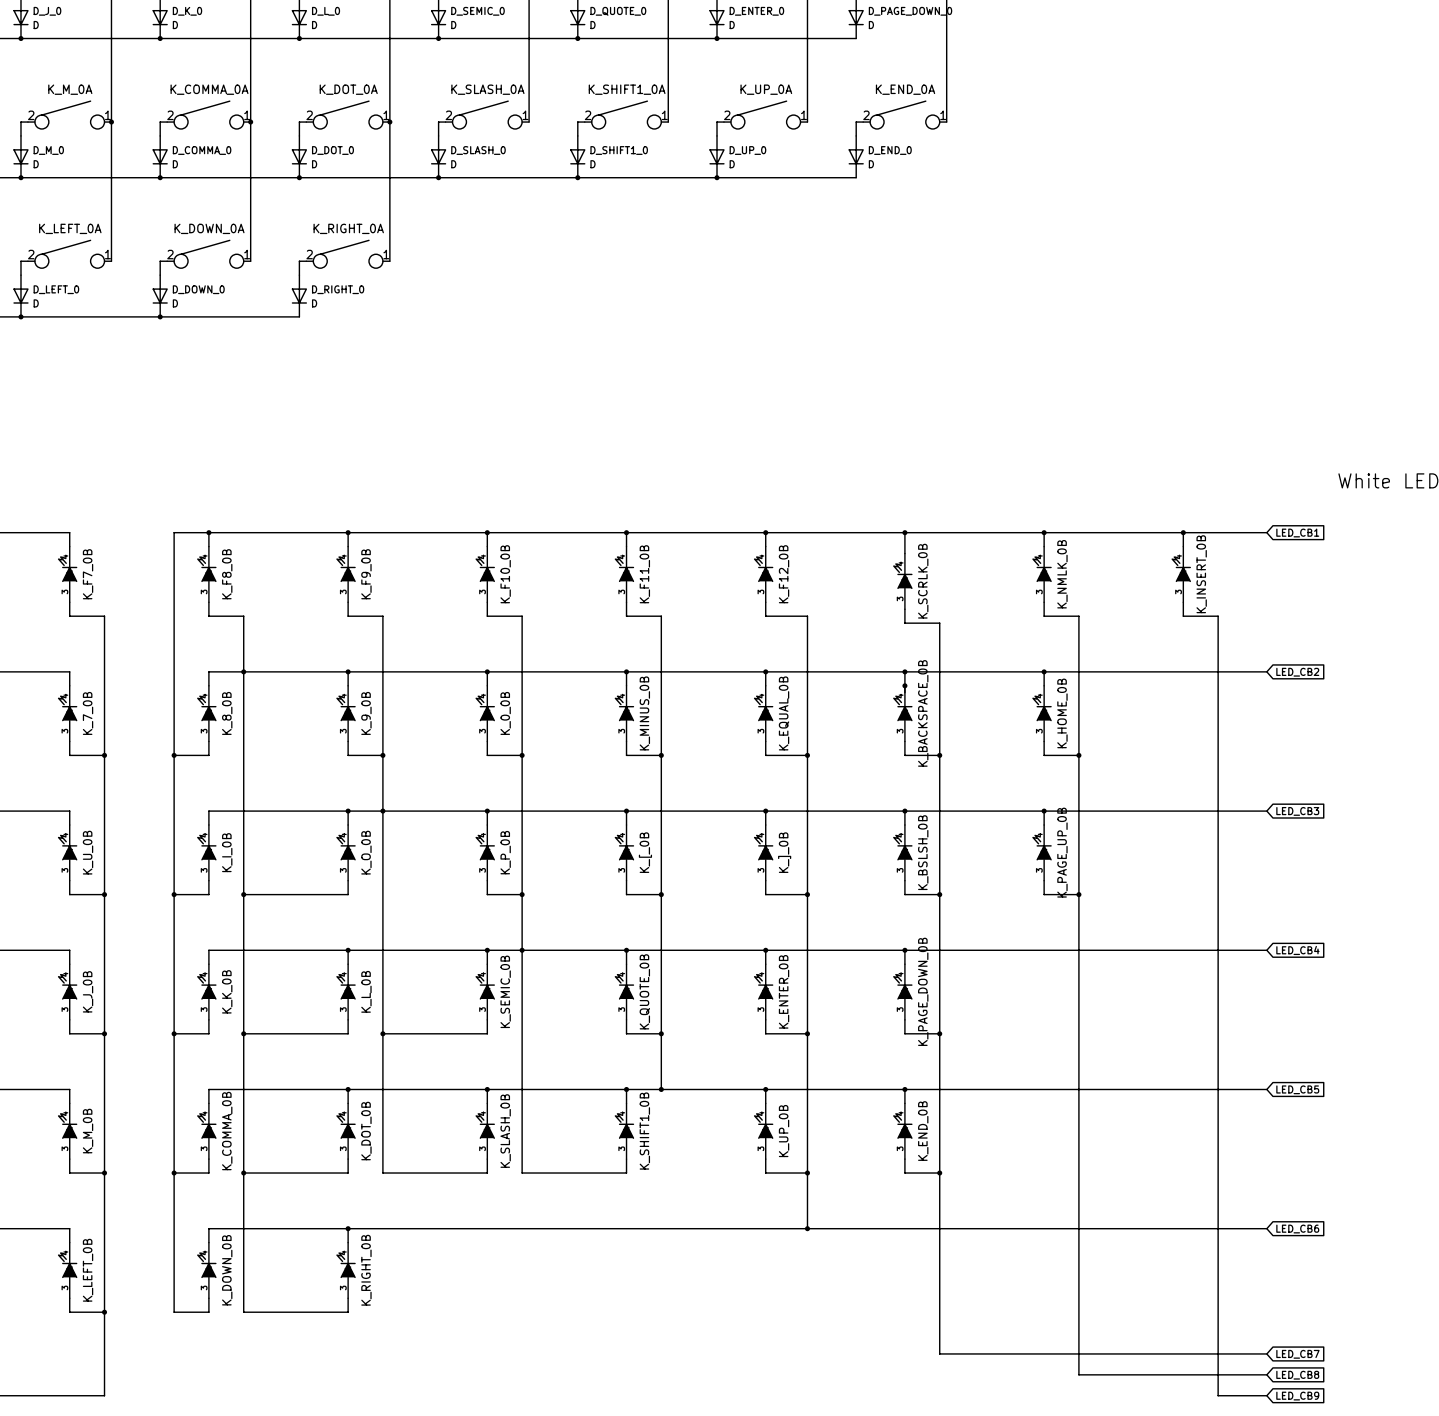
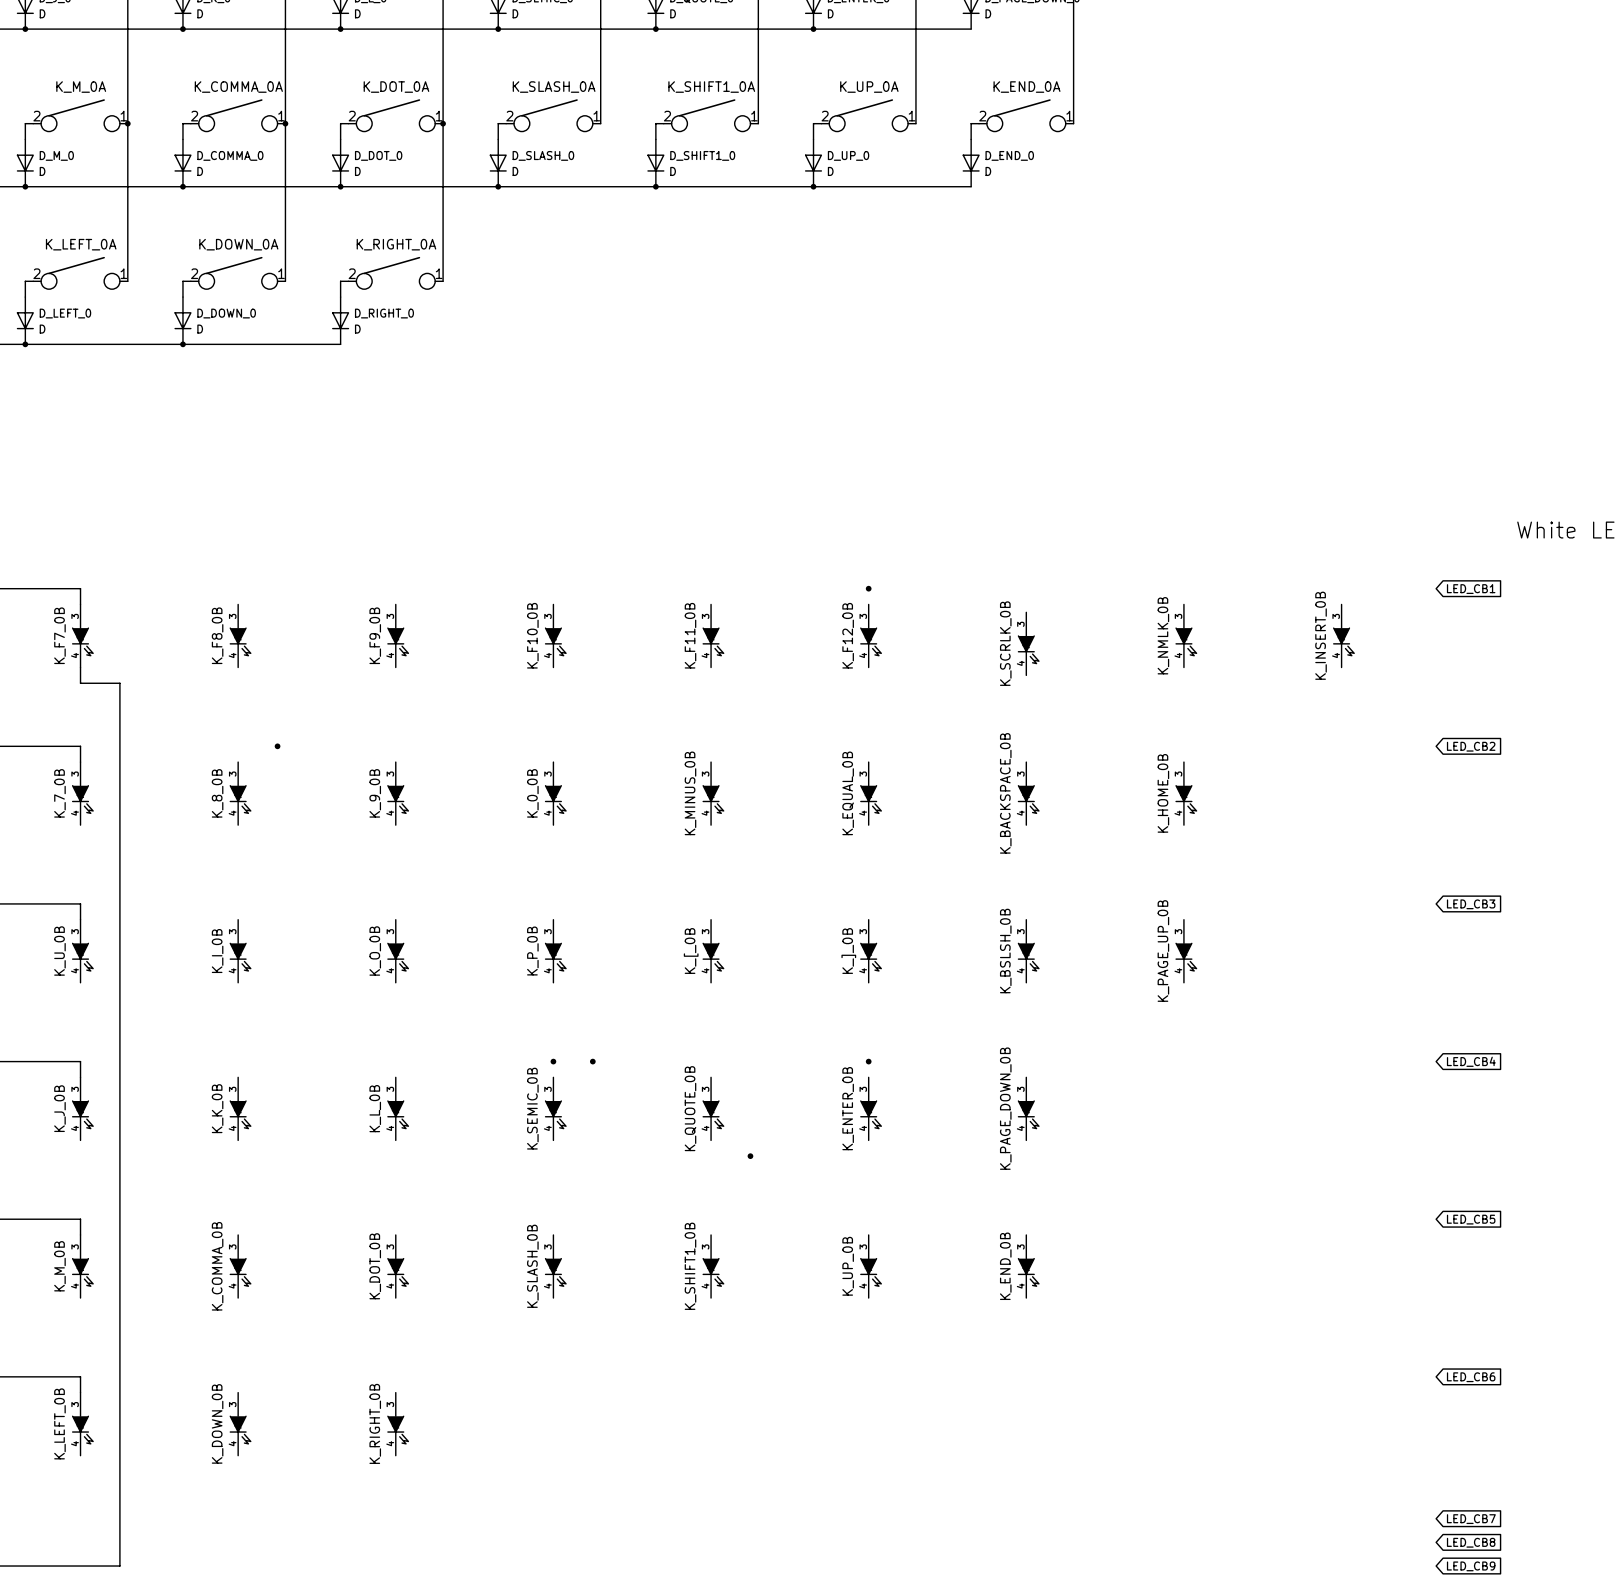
wire: (208, 532) (208, 546) -> none
junction: (208, 532) -> none
wire: (348, 532) (348, 546) -> none
junction: (348, 532) -> none
wire: (487, 532) (487, 546) -> none
junction: (487, 532) -> none
wire: (626, 532) (626, 546) -> none
junction: (626, 532) -> none
wire: (765, 532) (765, 546) -> none
wire: (904, 532) (904, 553) -> none
junction: (904, 532) -> none
wire: (1044, 532) (1044, 546) -> none
junction: (1044, 532) -> none
wire: (1183, 532) (1183, 546) -> none
junction: (1183, 532) -> none
wire: (1266, 532) (174, 532) (174, 1312) (208, 1312) (208, 1298) -> none
K_F7_0B rotation: 0° (67, 569) -> 180° (82, 641)
K_F8_0B rotation: 0° (206, 569) -> 180° (240, 641)
K_F9_0B rotation: 0° (346, 569) -> 180° (398, 641)
K_F10_0B rotation: 0° (485, 569) -> 180° (555, 641)
K_F11_0B rotation: 0° (624, 569) -> 180° (713, 641)
K_F12_0B rotation: 0° (763, 569) -> 180° (871, 641)
K_NMLK_0B rotation: 0° (1042, 569) -> 180° (1186, 641)
K_INSERT_0B rotation: 0° (1181, 569) -> 180° (1343, 641)
K_SCRLK_0B rotation: 0° (902, 576) -> 180° (1028, 649)
wire: (208, 602) (208, 616) (243, 616) (243, 1312) (348, 1312) (348, 1298) -> none
wire: (348, 602) (348, 616) (382, 616) (382, 1173) (487, 1173) (487, 1159) -> none
wire: (487, 602) (487, 616) (522, 616) (522, 1173) (626, 1173) (626, 1159) -> none
wire: (626, 602) (626, 616) (661, 616) (661, 1089) -> none
wire: (765, 602) (765, 616) (807, 616) (807, 1228) -> none
wire: (1044, 602) (1044, 616) (1078, 616) (1078, 1374) (1266, 1374) -> none
wire: (1183, 602) (1183, 616) (1218, 616) (1218, 1395) (1266, 1395) -> none
wire: (904, 609) (904, 623) (939, 623) (939, 1353) (1266, 1353) -> none
wire: (348, 671) (348, 685) -> none
junction: (348, 671) -> none
wire: (487, 671) (487, 685) -> none
junction: (487, 671) -> none
wire: (626, 671) (626, 685) -> none
junction: (626, 671) -> none
wire: (765, 671) (765, 685) -> none
junction: (765, 671) -> none
wire: (904, 671) (904, 692) -> none
junction: (904, 671) -> none
wire: (1044, 671) (1044, 685) -> none
junction: (1044, 671) -> none
wire: (1266, 671) (208, 671) (208, 685) -> none
junction: (904, 685) -> none
K_7_0B rotation: 0° (67, 708) -> 180° (82, 799)
K_8_0B rotation: 0° (206, 708) -> 180° (240, 799)
K_9_0B rotation: 0° (346, 708) -> 180° (398, 799)
K_0_0B rotation: 0° (485, 708) -> 180° (555, 799)
K_MINUS_0B rotation: 0° (624, 708) -> 180° (713, 799)
K_EQUAL_0B rotation: 0° (763, 708) -> 180° (871, 799)
K_BACKSPACE_0B rotation: 0° (902, 708) -> 180° (1028, 799)
K_HOME_0B rotation: 0° (1042, 708) -> 180° (1186, 799)
wire: (69, 741) (69, 755) (104, 755) -> none
wire: (208, 741) (208, 755) (174, 755) -> none
wire: (348, 741) (348, 755) (382, 755) -> none
wire: (487, 741) (487, 755) (522, 755) -> none
wire: (626, 741) (626, 755) (661, 755) -> none
wire: (765, 741) (765, 755) (807, 755) -> none
wire: (904, 741) (904, 755) (939, 755) -> none
wire: (1044, 741) (1044, 755) (1078, 755) -> none
junction: (104, 755) -> none
junction: (174, 755) -> none
junction: (382, 755) -> none
junction: (522, 755) -> none
junction: (661, 755) -> none
junction: (807, 755) -> none
junction: (939, 755) -> none
junction: (1078, 755) -> none
wire: (348, 811) (348, 825) -> none
junction: (348, 811) -> none
junction: (382, 811) -> none
wire: (487, 811) (487, 825) -> none
junction: (487, 811) -> none
wire: (626, 811) (626, 825) -> none
junction: (626, 811) -> none
wire: (765, 811) (765, 825) -> none
junction: (765, 811) -> none
wire: (904, 811) (904, 825) -> none
junction: (904, 811) -> none
wire: (1044, 811) (1044, 825) -> none
junction: (1044, 811) -> none
wire: (1266, 811) (208, 811) (208, 825) -> none
K_U_0B rotation: 0° (67, 847) -> 180° (82, 957)
K_I_0B rotation: 0° (206, 847) -> 180° (240, 957)
K_O_0B rotation: 0° (346, 847) -> 180° (398, 957)
K_P_0B rotation: 0° (485, 847) -> 180° (555, 957)
K_[_0B rotation: 0° (624, 847) -> 180° (713, 957)
K_]_0B rotation: 0° (763, 847) -> 180° (871, 957)
K_BSLSH_0B rotation: 0° (902, 847) -> 180° (1028, 957)
K_PAGE_UP_0B rotation: 0° (1042, 847) -> 180° (1186, 957)
wire: (69, 880) (69, 894) (104, 894) -> none
wire: (208, 880) (208, 894) (174, 894) -> none
wire: (348, 880) (348, 894) (243, 894) -> none
wire: (487, 880) (487, 894) (522, 894) -> none
wire: (626, 880) (626, 894) (661, 894) -> none
wire: (765, 880) (765, 894) (807, 894) -> none
wire: (904, 880) (904, 894) (939, 894) -> none
wire: (1044, 880) (1044, 894) (1078, 894) -> none
junction: (104, 894) -> none
junction: (174, 894) -> none
junction: (243, 894) -> none
junction: (522, 894) -> none
junction: (661, 894) -> none
junction: (807, 894) -> none
junction: (939, 894) -> none
junction: (1078, 894) -> none
wire: (348, 950) (348, 964) -> none
junction: (348, 950) -> none
wire: (487, 950) (487, 964) -> none
wire: (626, 950) (626, 964) -> none
junction: (626, 950) -> none
wire: (765, 950) (765, 964) -> none
wire: (904, 950) (904, 964) -> none
junction: (904, 950) -> none
wire: (1266, 950) (208, 950) (208, 964) -> none
K_J_0B rotation: 0° (67, 986) -> 180° (82, 1114)
K_K_0B rotation: 0° (206, 986) -> 180° (240, 1114)
K_L_0B rotation: 0° (346, 986) -> 180° (398, 1114)
K_SEMIC_0B rotation: 0° (485, 986) -> 180° (555, 1114)
K_QUOTE_0B rotation: 0° (624, 986) -> 180° (713, 1114)
K_ENTER_0B rotation: 0° (763, 986) -> 180° (871, 1114)
K_PAGE_DOWN_0B rotation: 0° (902, 986) -> 180° (1028, 1114)
wire: (69, 1019) (69, 1033) (104, 1033) -> none
wire: (208, 1019) (208, 1033) (174, 1033) -> none
wire: (348, 1019) (348, 1033) (243, 1033) -> none
wire: (487, 1019) (487, 1033) (382, 1033) -> none
wire: (626, 1019) (626, 1033) (661, 1033) -> none
wire: (765, 1019) (765, 1033) (807, 1033) -> none
wire: (904, 1019) (904, 1033) (939, 1033) -> none
junction: (104, 1033) -> none
junction: (174, 1033) -> none
junction: (243, 1033) -> none
junction: (382, 1033) -> none
junction: (807, 1033) -> none
junction: (939, 1033) -> none
wire: (348, 1089) (348, 1103) -> none
junction: (348, 1089) -> none
wire: (487, 1089) (487, 1103) -> none
junction: (487, 1089) -> none
wire: (626, 1089) (626, 1103) -> none
junction: (626, 1089) -> none
junction: (661, 1089) -> none
wire: (765, 1089) (765, 1103) -> none
junction: (765, 1089) -> none
wire: (904, 1089) (904, 1103) -> none
junction: (904, 1089) -> none
wire: (1266, 1089) (208, 1089) (208, 1103) -> none
K_M_0B rotation: 0° (67, 1126) -> 180° (82, 1272)
K_COMMA_0B rotation: 0° (206, 1126) -> 180° (240, 1272)
K_DOT_0B rotation: 0° (346, 1126) -> 180° (398, 1272)
K_SLASH_0B rotation: 0° (485, 1126) -> 180° (555, 1272)
K_SHIFT1_0B rotation: 0° (624, 1126) -> 180° (713, 1272)
K_UP_0B rotation: 0° (763, 1126) -> 180° (871, 1272)
K_END_0B rotation: 0° (902, 1126) -> 180° (1028, 1272)
wire: (69, 1159) (69, 1173) (104, 1173) -> none
wire: (208, 1159) (208, 1173) (174, 1173) -> none
wire: (348, 1159) (348, 1173) (243, 1173) -> none
wire: (765, 1159) (765, 1173) (807, 1173) -> none
wire: (904, 1159) (904, 1173) (939, 1173) -> none
junction: (104, 1173) -> none
junction: (174, 1173) -> none
junction: (243, 1173) -> none
junction: (807, 1173) -> none
junction: (939, 1173) -> none
wire: (348, 1228) (348, 1242) -> none
junction: (348, 1228) -> none
junction: (807, 1228) -> none
wire: (1266, 1228) (208, 1228) (208, 1242) -> none
K_LEFT_0B rotation: 0° (67, 1265) -> 180° (82, 1430)
K_DOWN_0B rotation: 0° (206, 1265) -> 180° (240, 1430)
K_RIGHT_0B rotation: 0° (346, 1265) -> 180° (398, 1430)
wire: (69, 1298) (69, 1312) (104, 1312) -> none
junction: (104, 1312) -> none

